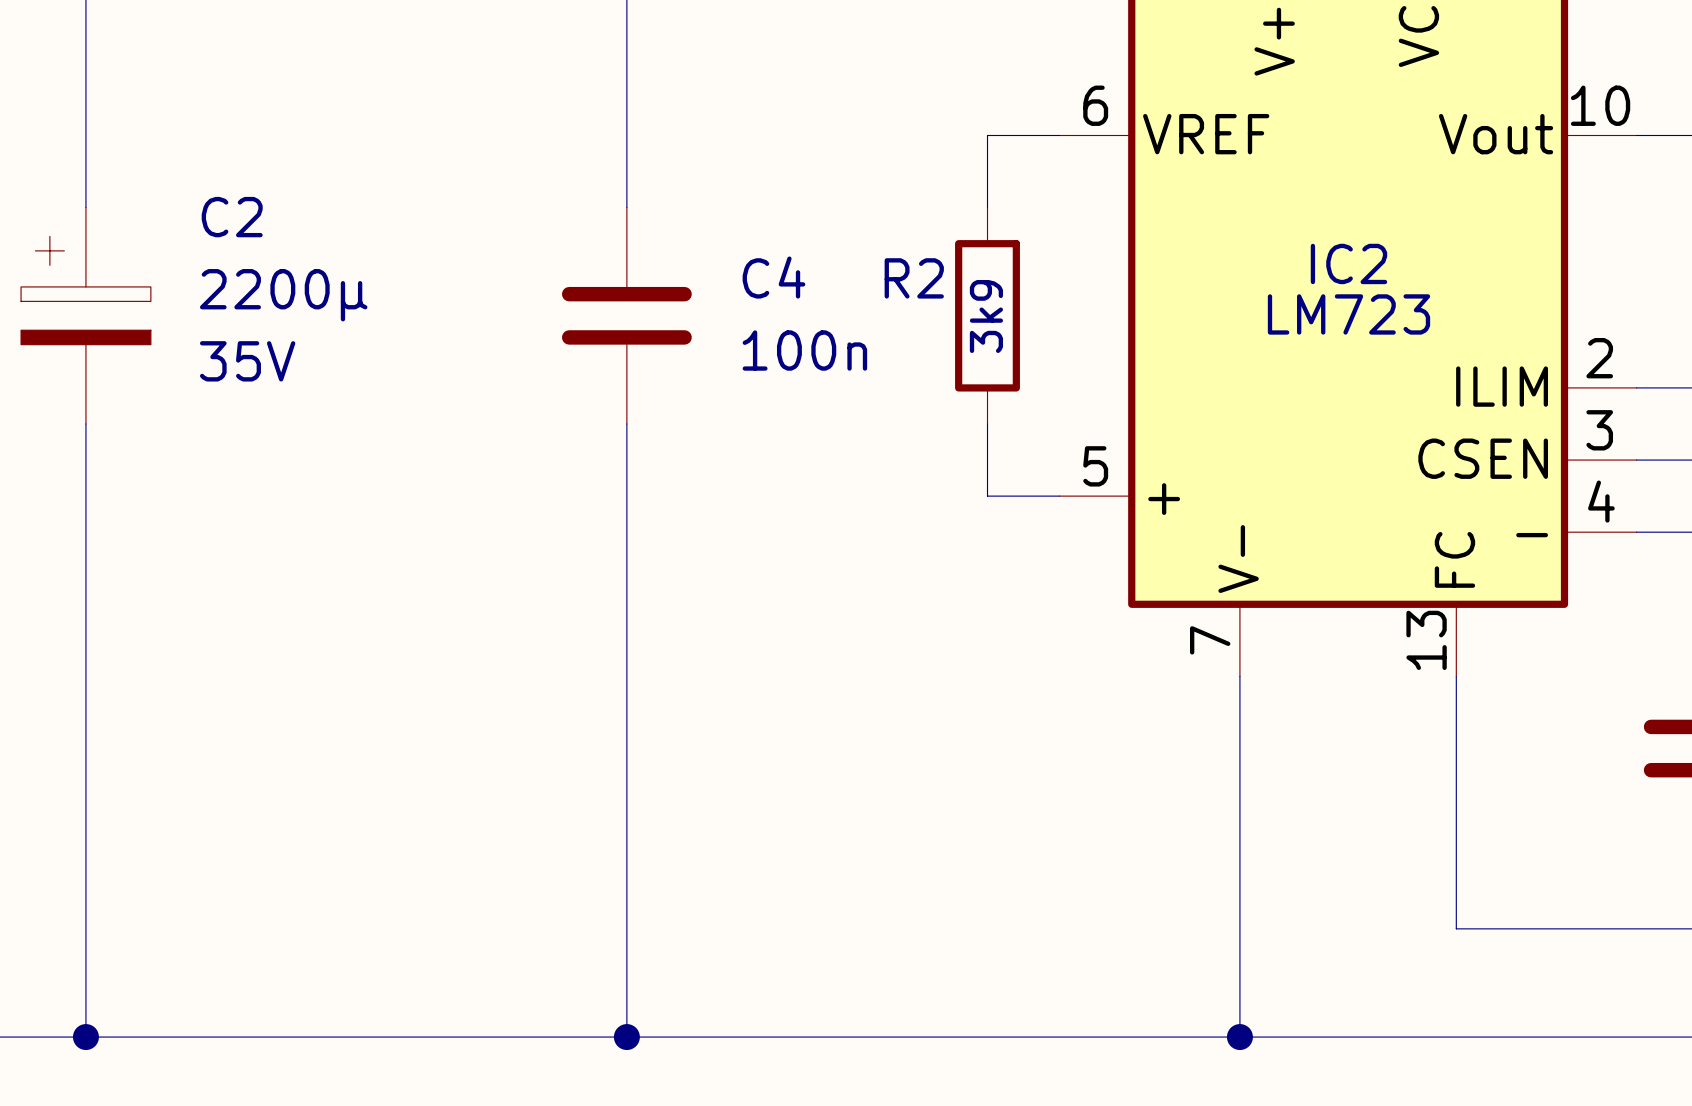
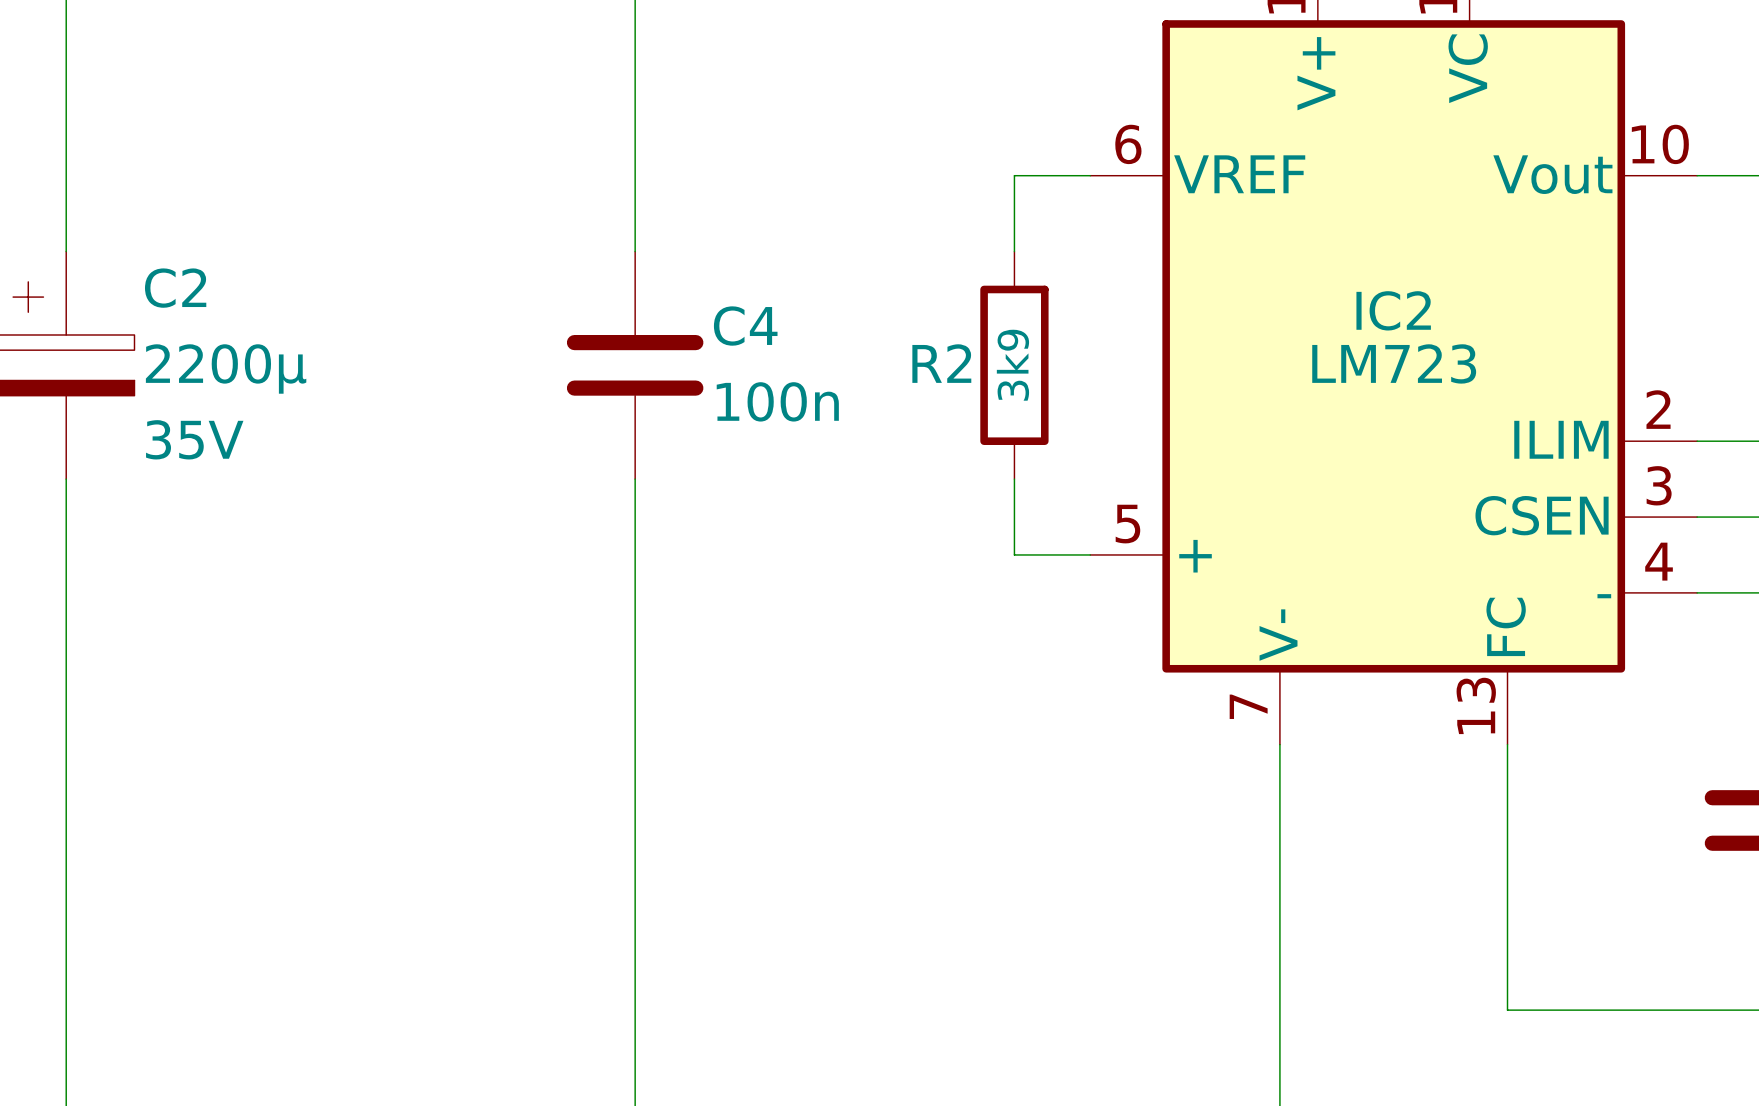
C2 name position: C2 (232, 217) -> C2 (175, 288)
C4 name position: C4 (773, 277) -> C4 (745, 326)
R2 name position: R2 (914, 278) -> R2 (941, 363)
C2 value position: 2200µ (283, 295) -> 2200µ (226, 368)
C4 value position: 100n (804, 350) -> 100n (777, 401)
C2 text position: 35V (247, 361) -> 35V (194, 439)

